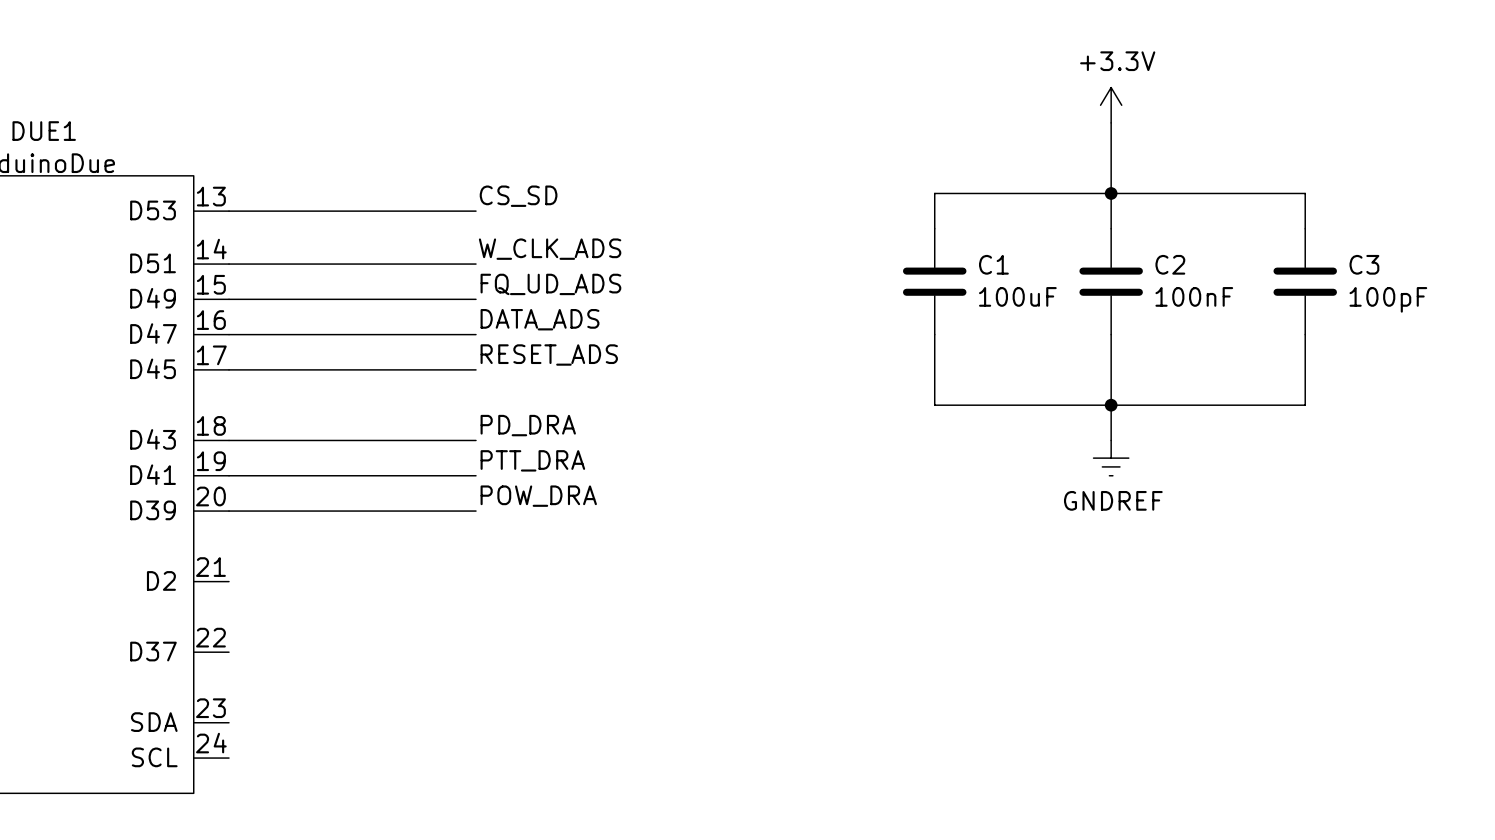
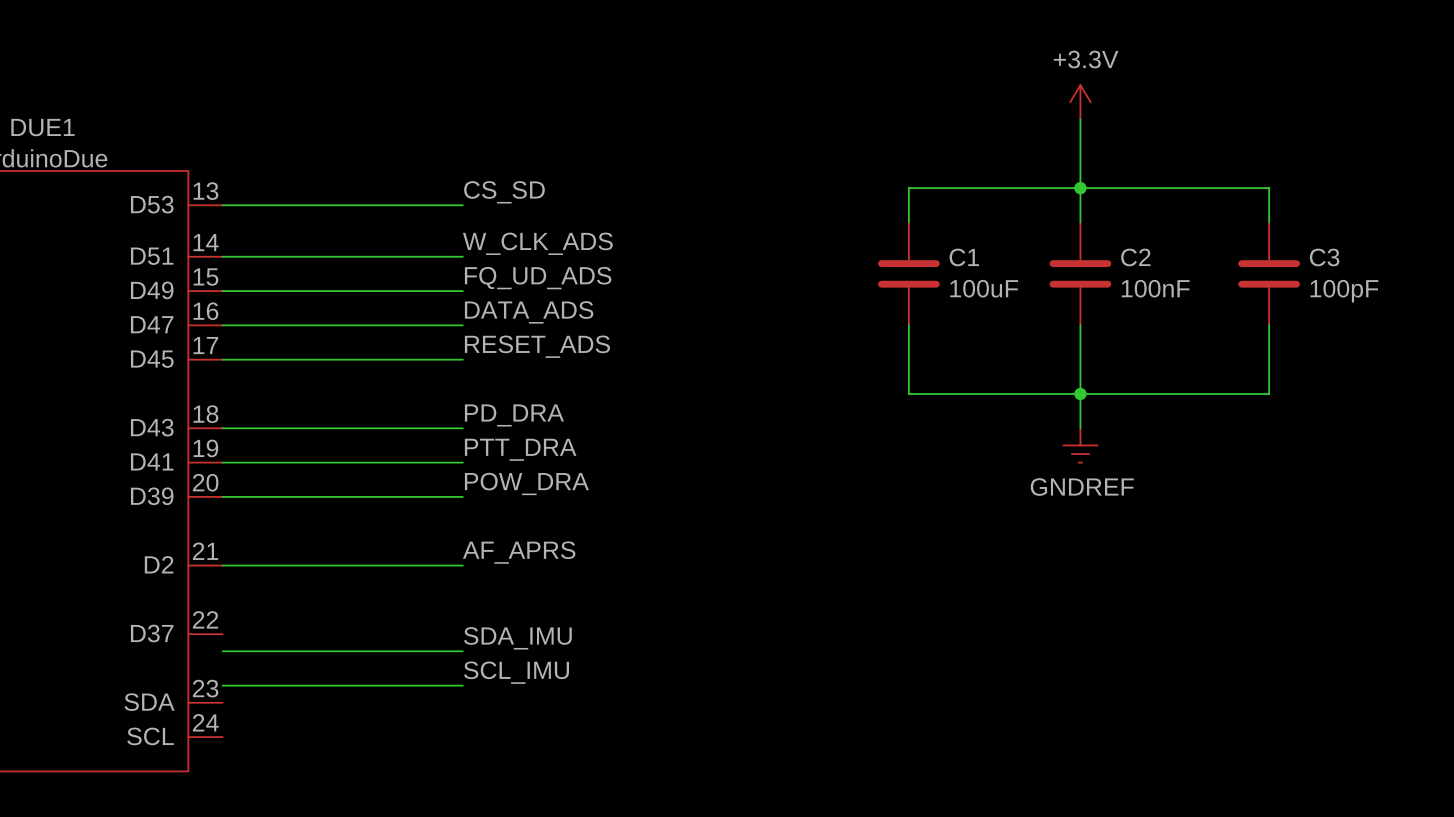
label: none -> AF_APRS (519, 552)
wire: none -> (222, 565) (462, 565)
label: none -> SDA_IMU (517, 638)
wire: none -> (222, 651) (462, 651)
label: none -> SCL_IMU (516, 672)
wire: none -> (222, 685) (462, 685)

